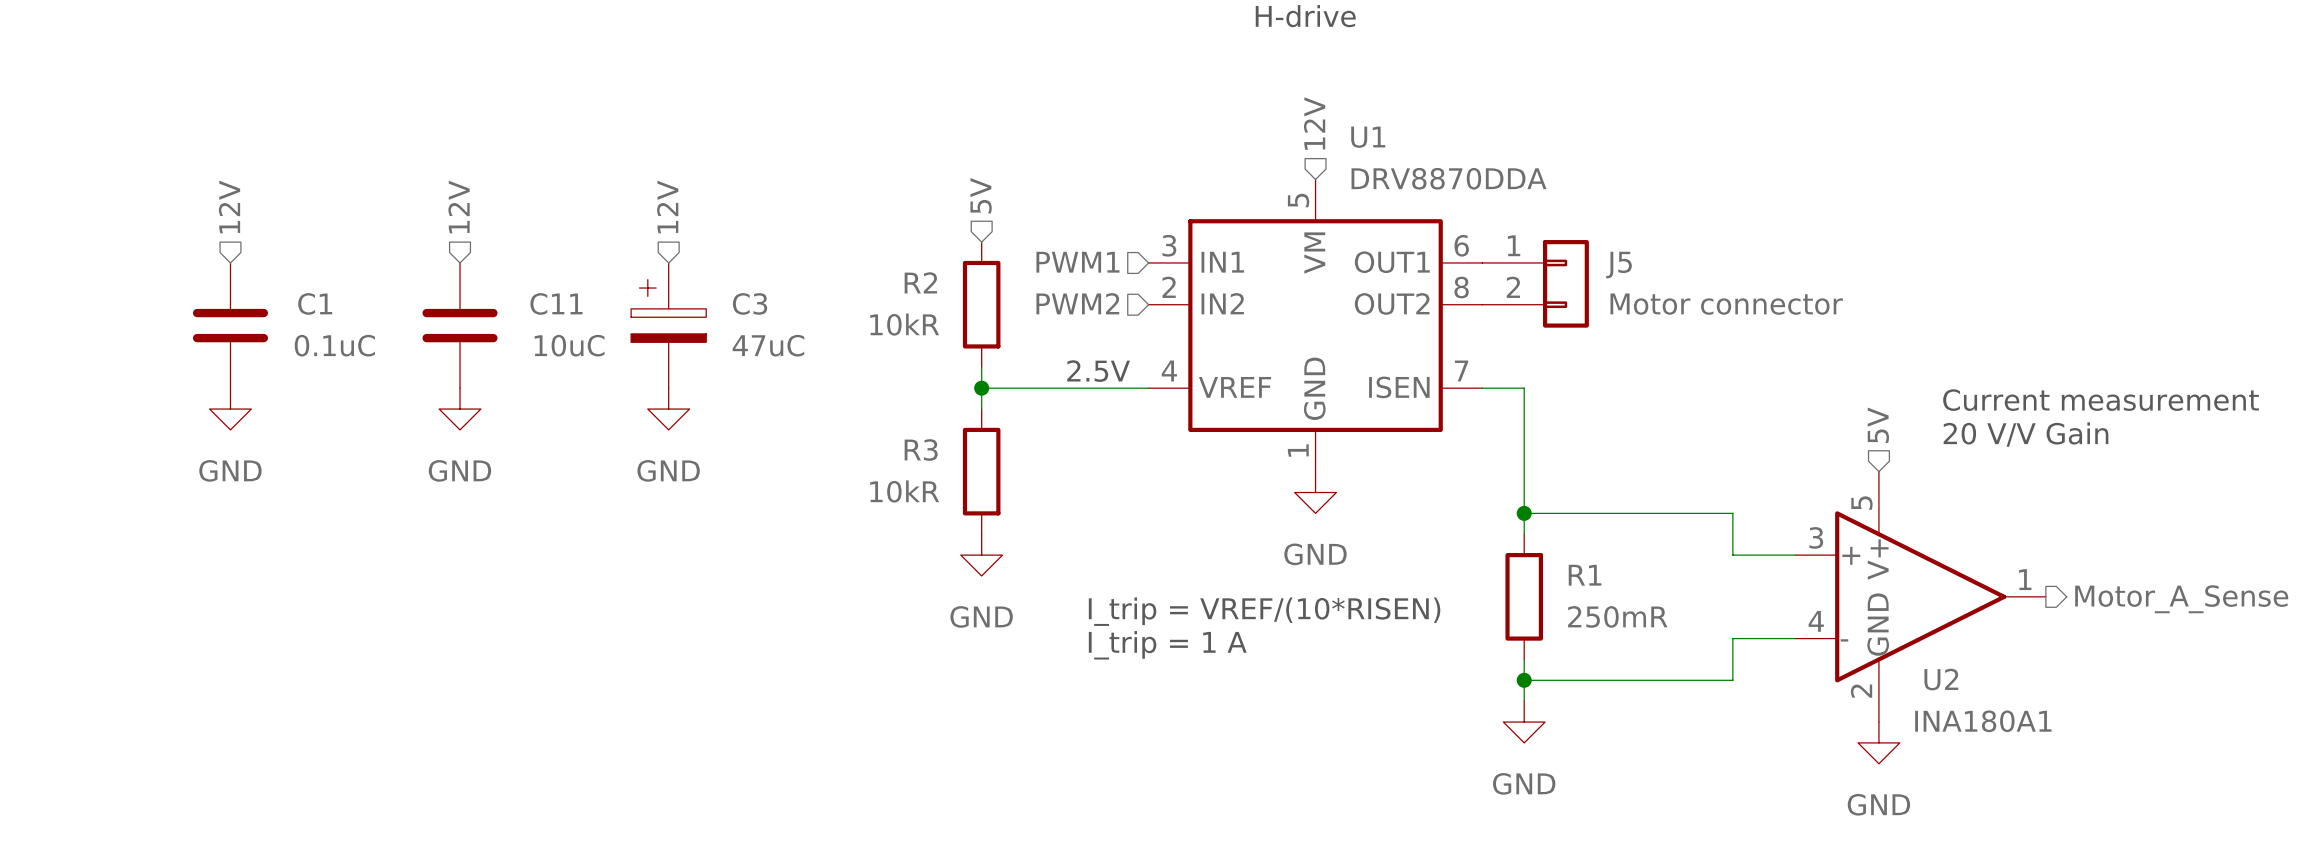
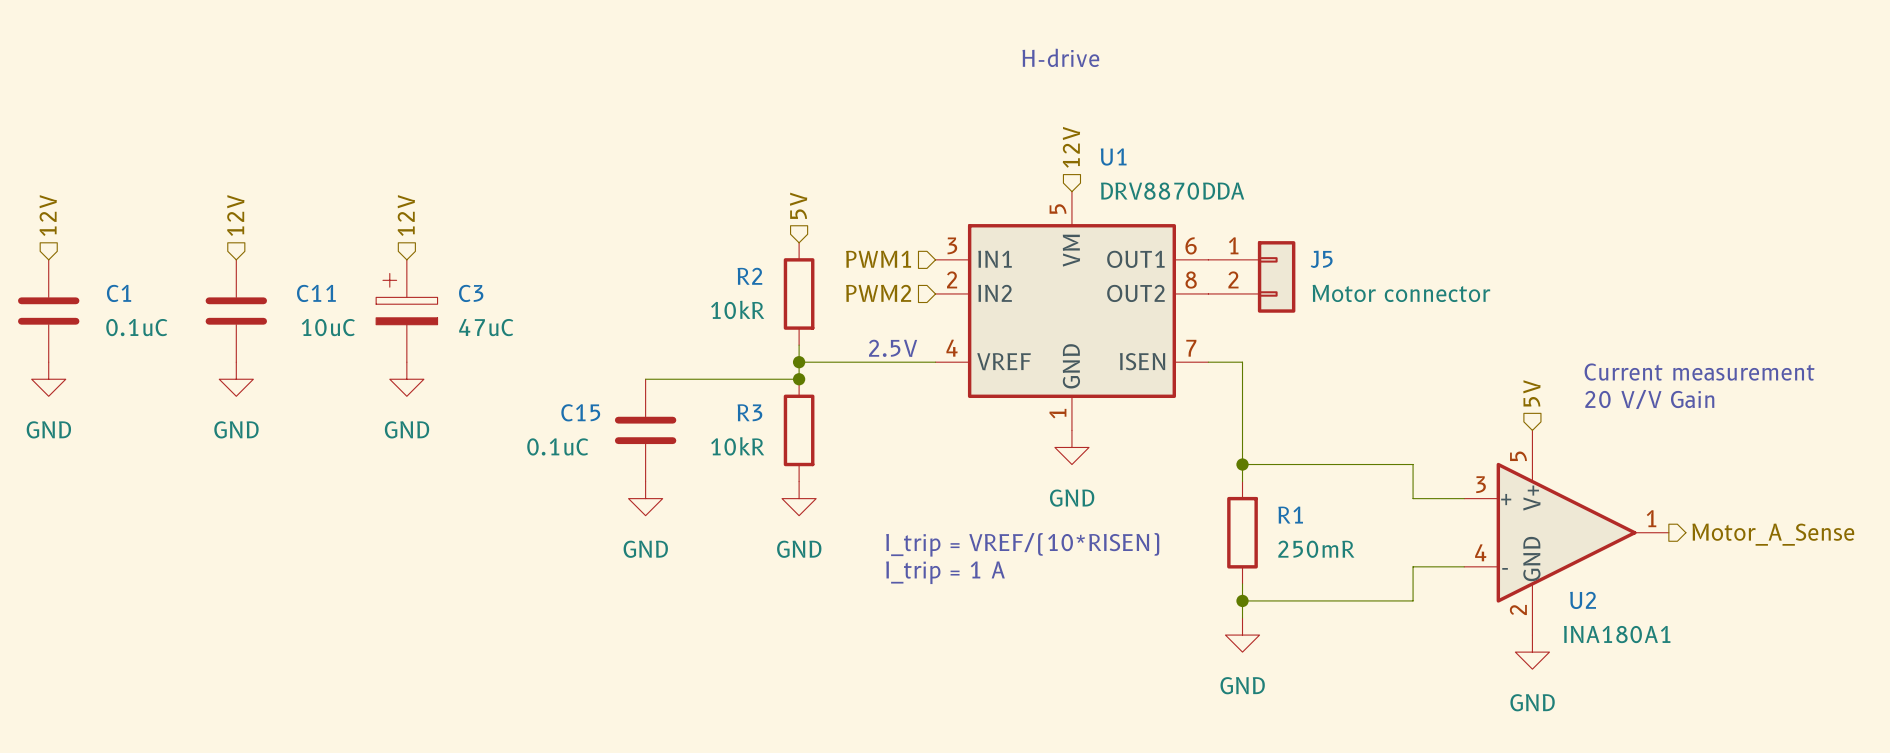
hierarchical label: none -> 12V (48, 215)
hierarchical label position: 12V (229, 207) -> 12V (235, 215)
hierarchical label position: 12V (459, 207) -> 12V (406, 215)
hierarchical label: 12V (667, 207) -> none
C1 position: (230, 325) -> (48, 311)
C11 position: (460, 325) -> (236, 311)
C3 position: (668, 325) -> (406, 311)
power symbol: none -> GND (48, 379)
power symbol position: GND (230, 409) -> GND (236, 379)
power symbol position: GND (460, 409) -> GND (406, 379)
power symbol: GND (668, 409) -> none
wire: none -> (645, 379) (799, 379)
junction: none -> (799, 379)
C15: none -> 0.1uC (645, 430)
power symbol: none -> GND (645, 498)

